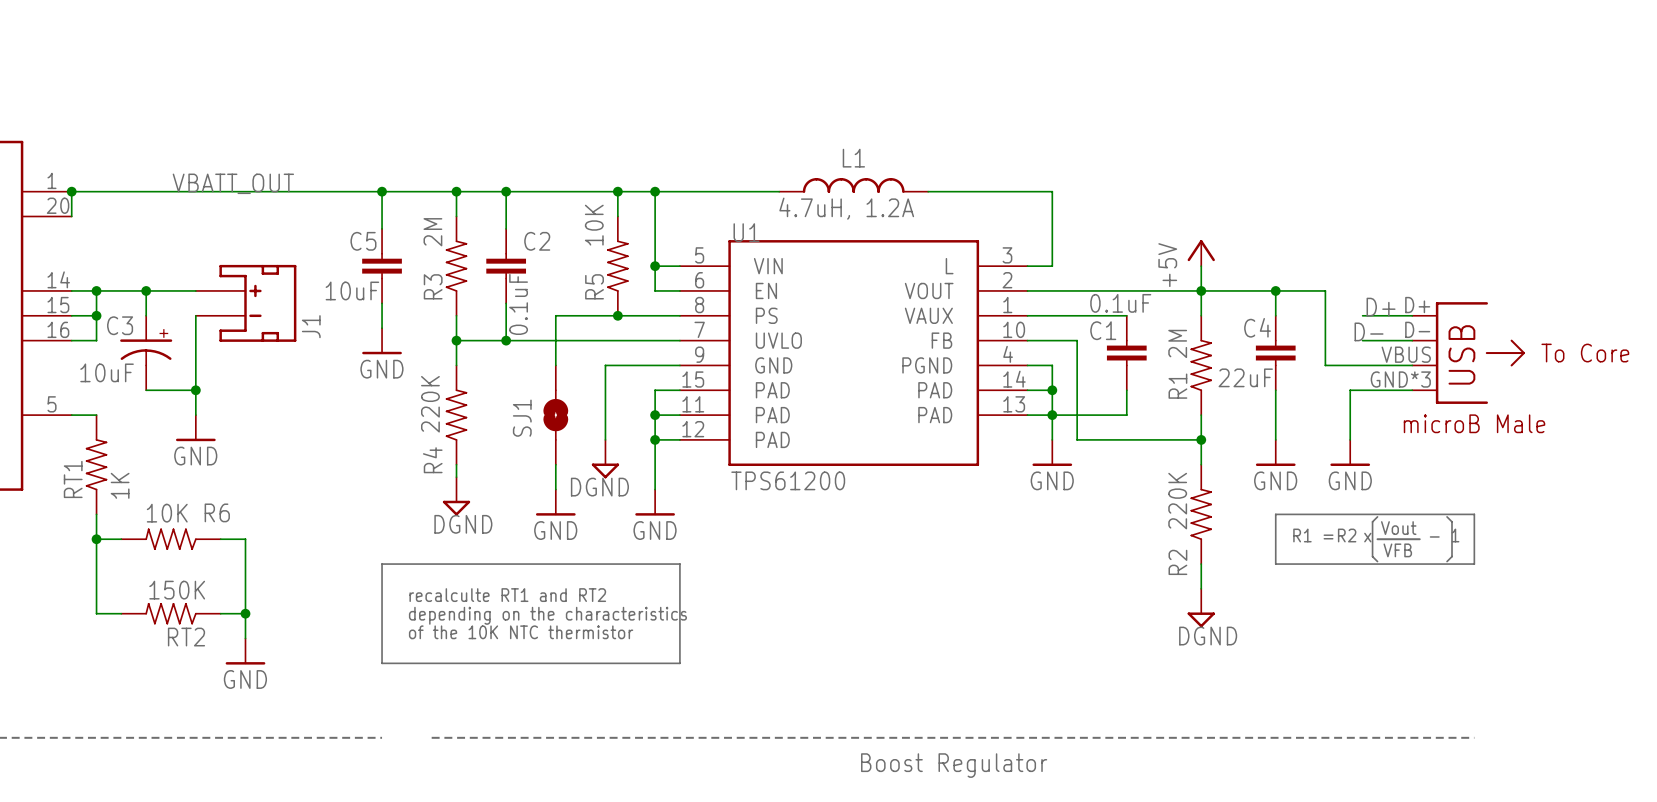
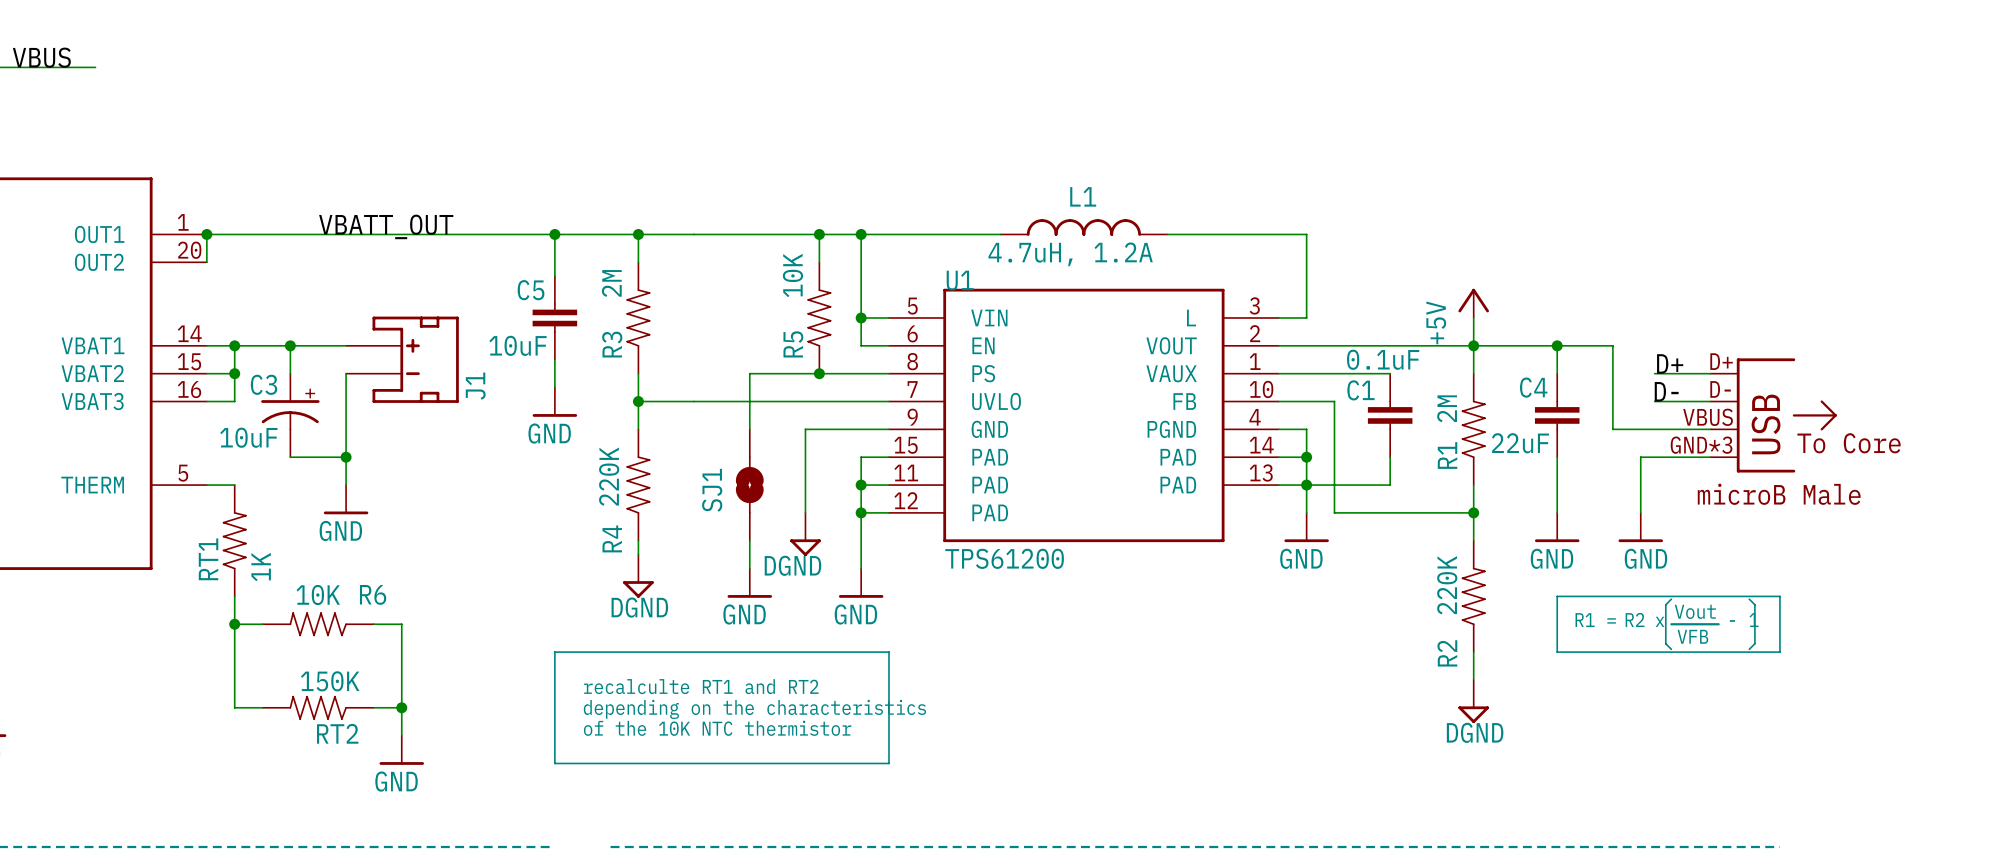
wire: (506, 191) (506, 228) -> none
junction: (506, 191) -> none
C2: 0.1uF (506, 266) -> none
wire: (506, 303) (506, 340) -> none
junction: (506, 340) -> none
text position: To Core (1585, 353) -> To Core (1849, 443)

